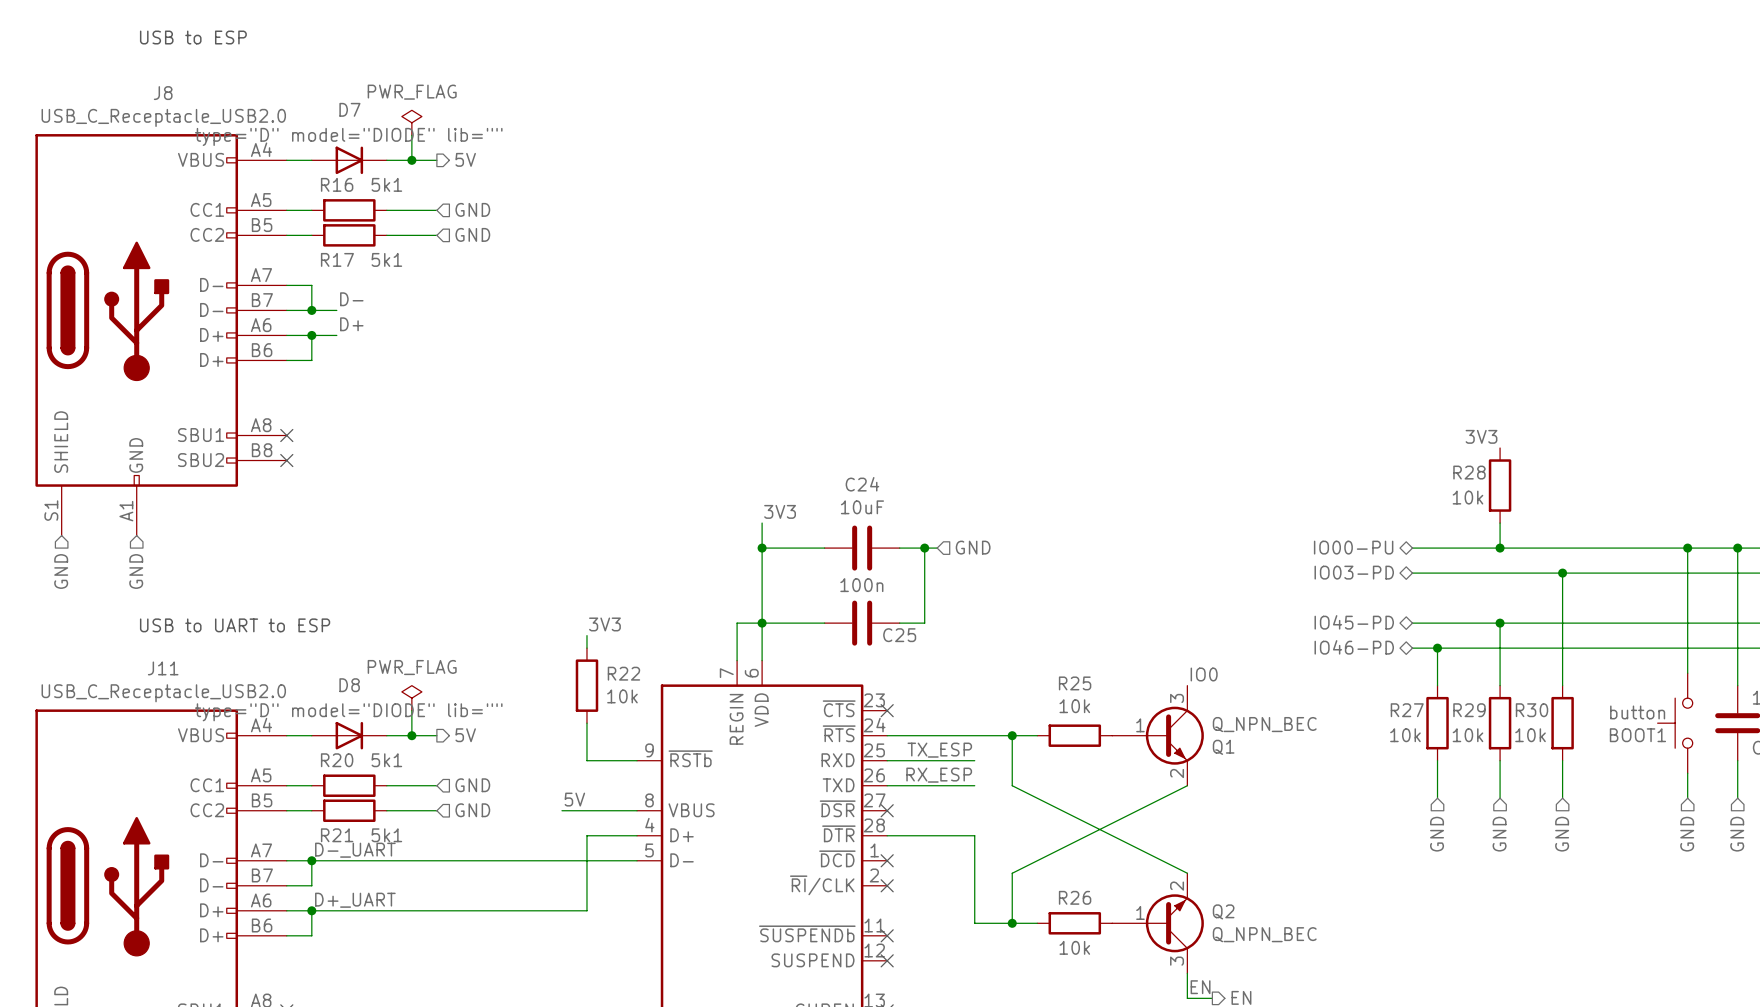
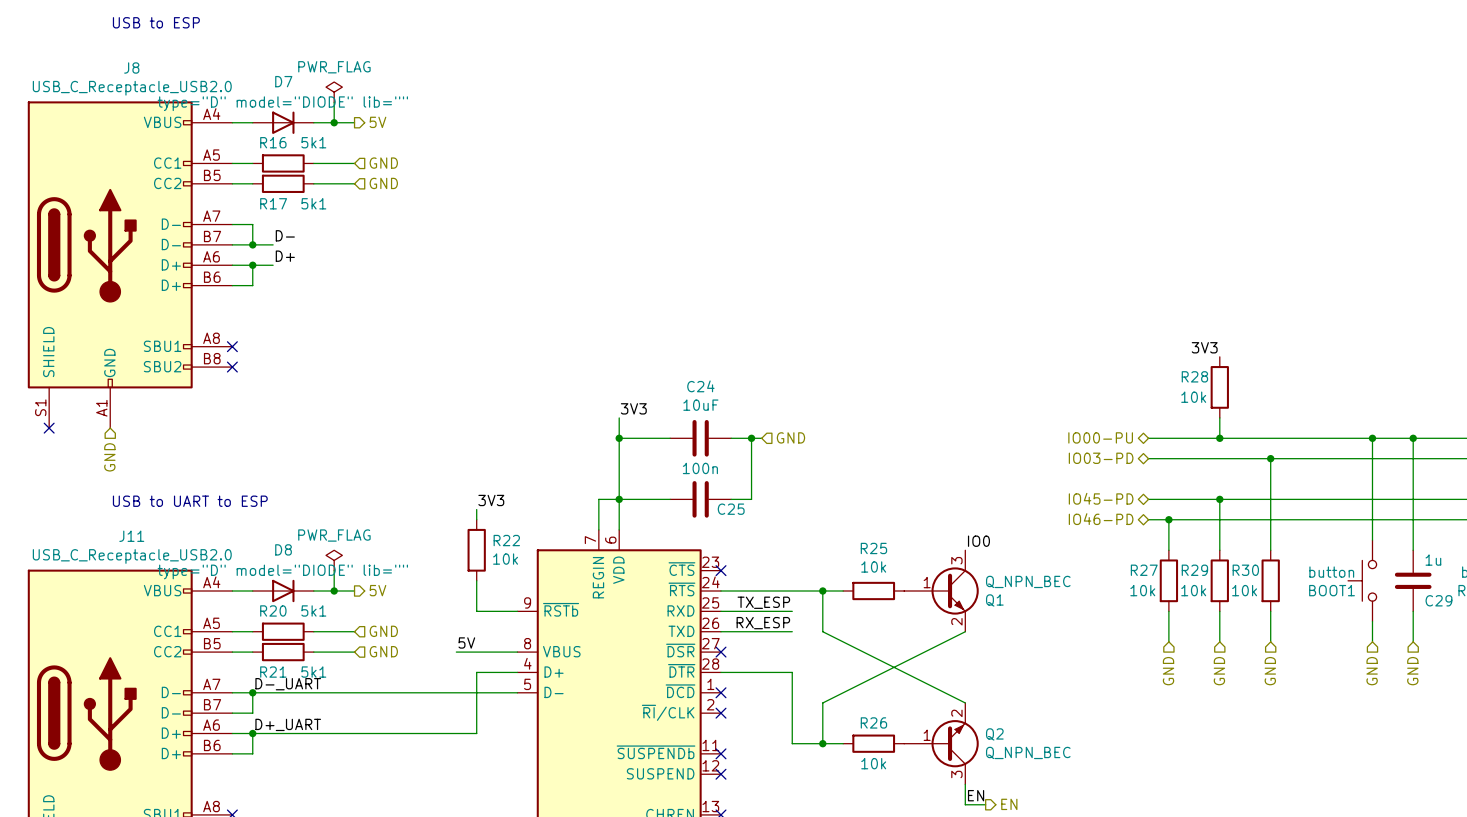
no-connect mark: none -> (49, 428)
hierarchical label: GND (61, 571) -> none

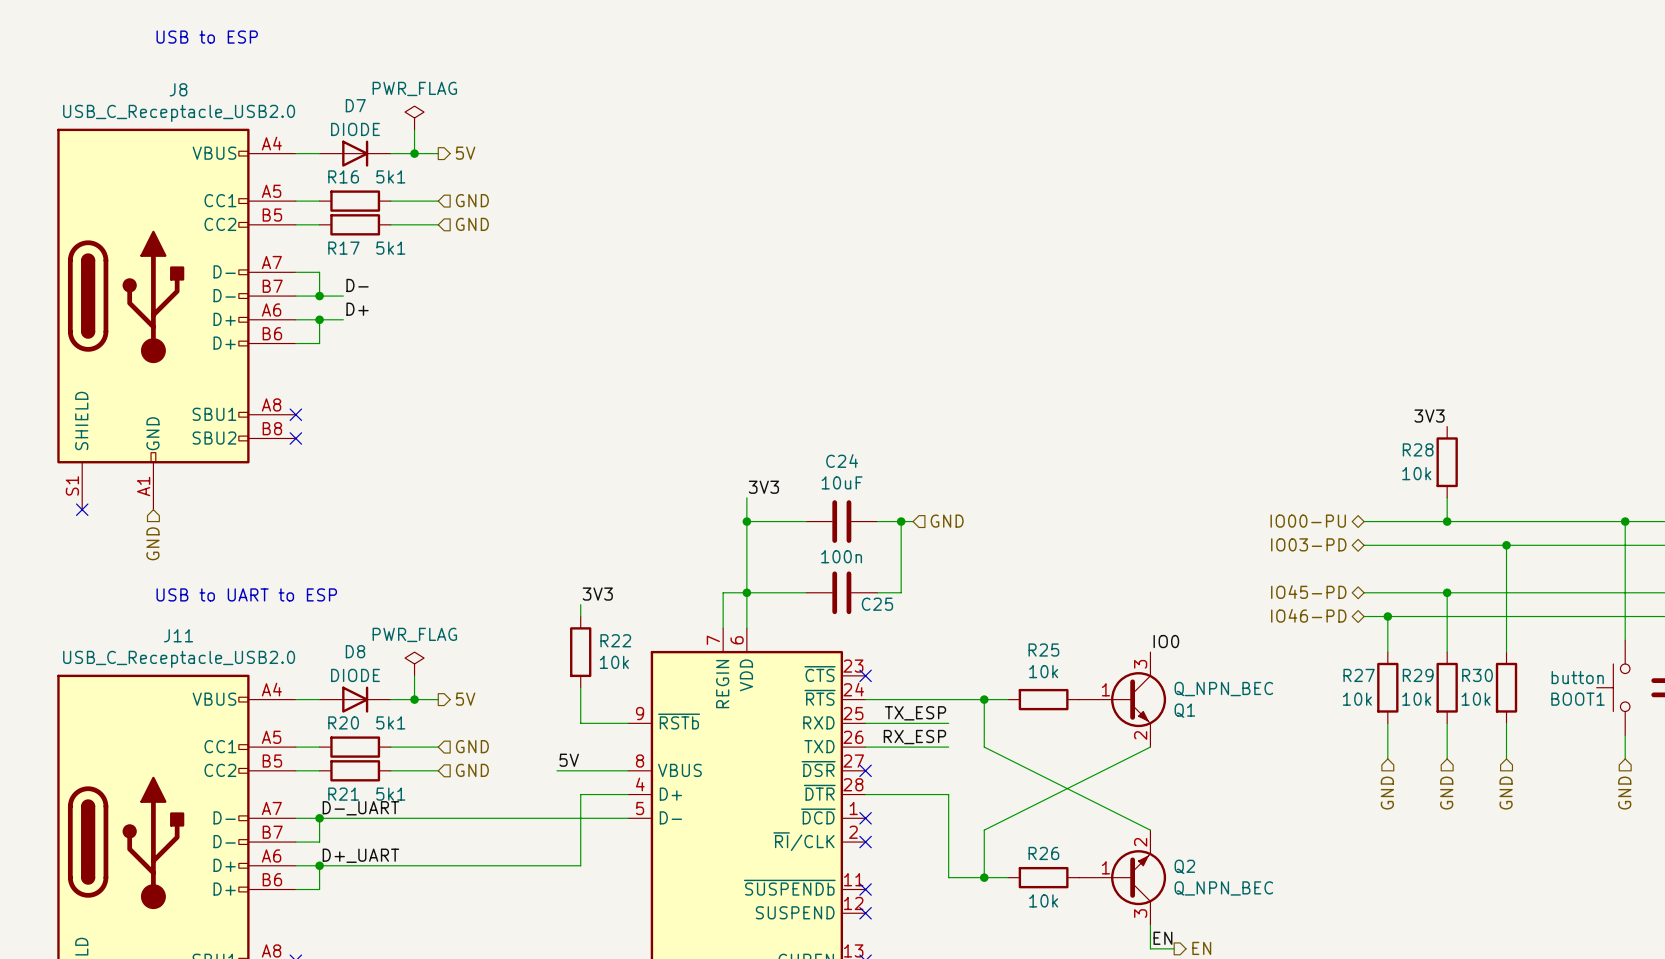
D7 value: type="D" model="DIODE" lib="" (282, 103) -> DIODE (355, 129)
D8 value: type="D" model="DIODE" lib="" (282, 571) -> DIODE (355, 675)

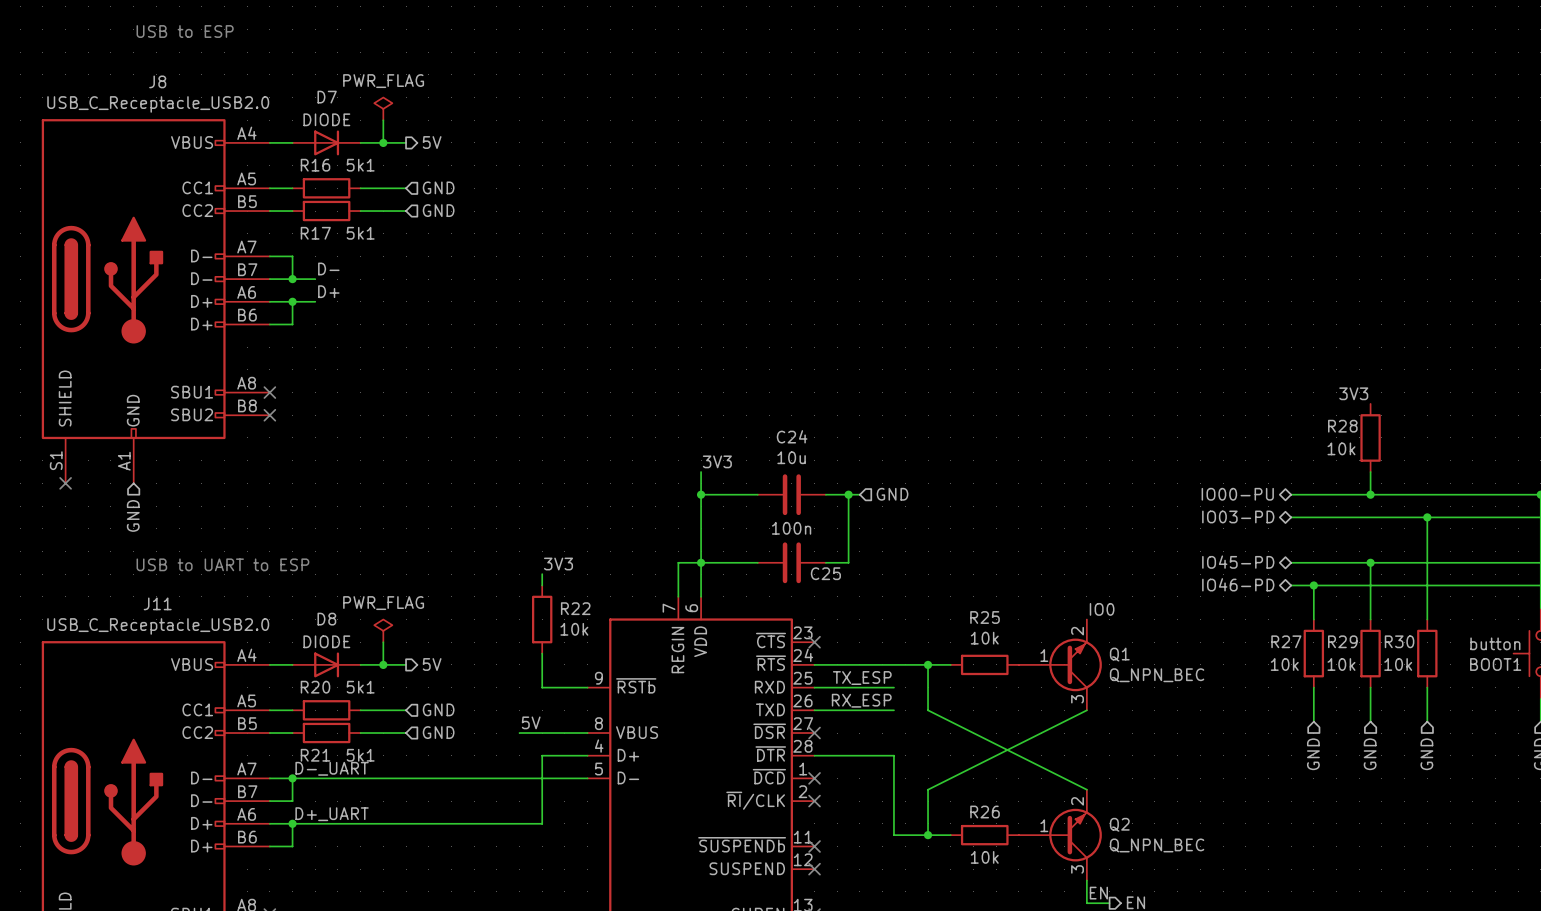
C24 value: 10uF (842, 482) -> 10u (791, 457)
Q1 flip: as is (1138, 699) -> up-down (1075, 664)

